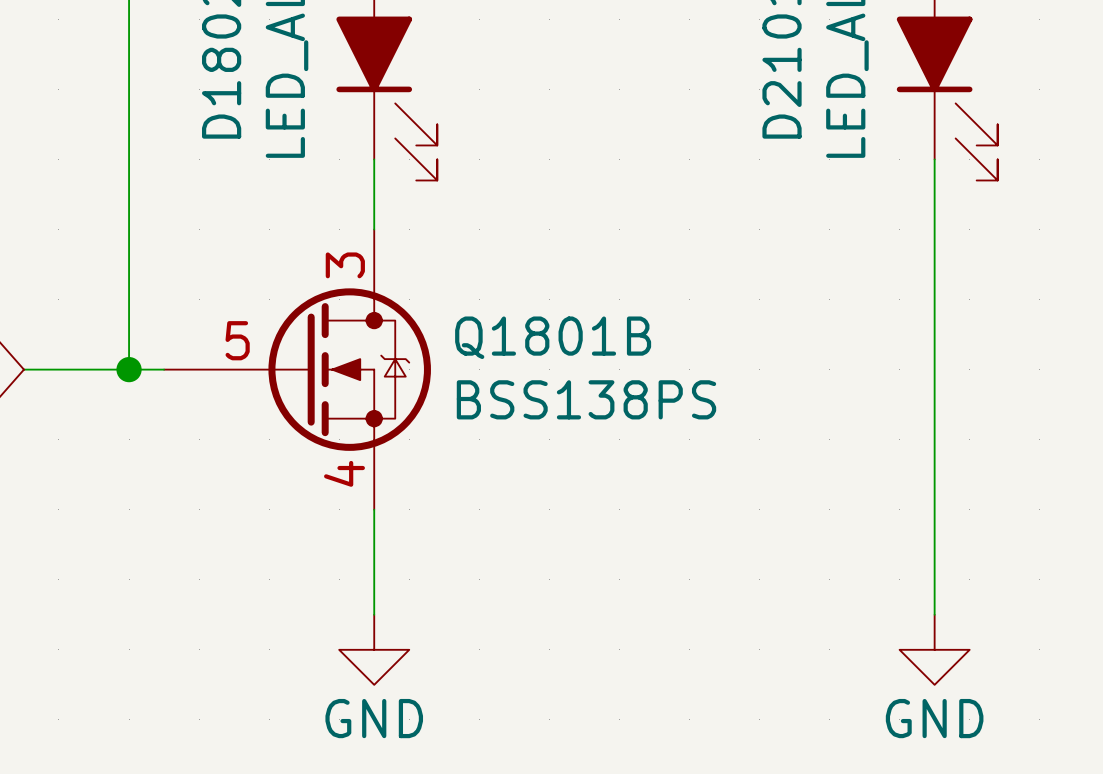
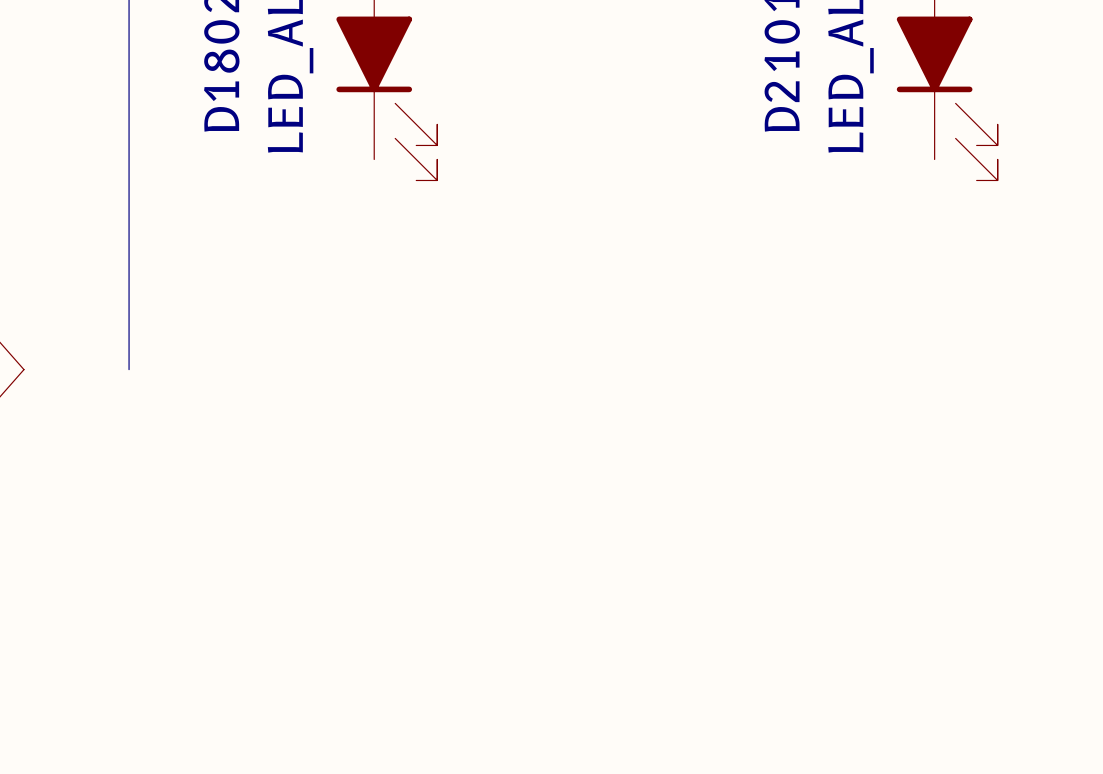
wire: (374, 159) (374, 229) -> none
wire: (934, 159) (934, 614) -> none
wire: (23, 369) (164, 369) -> none
junction: (129, 369) -> none
Q1801B: BSS138PS (297, 369) -> none
wire: (374, 509) (374, 614) -> none
power symbol: GND (374, 649) -> none
power symbol: GND (934, 649) -> none

